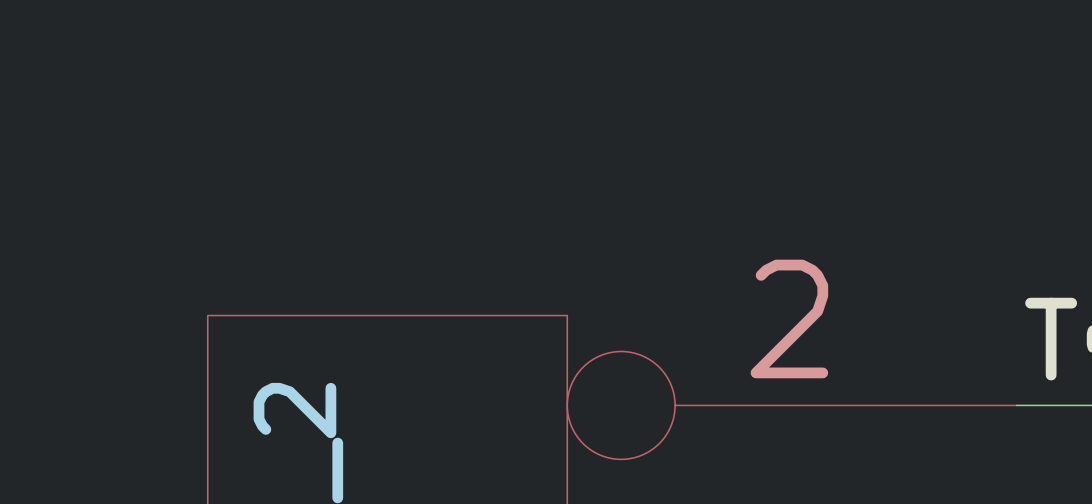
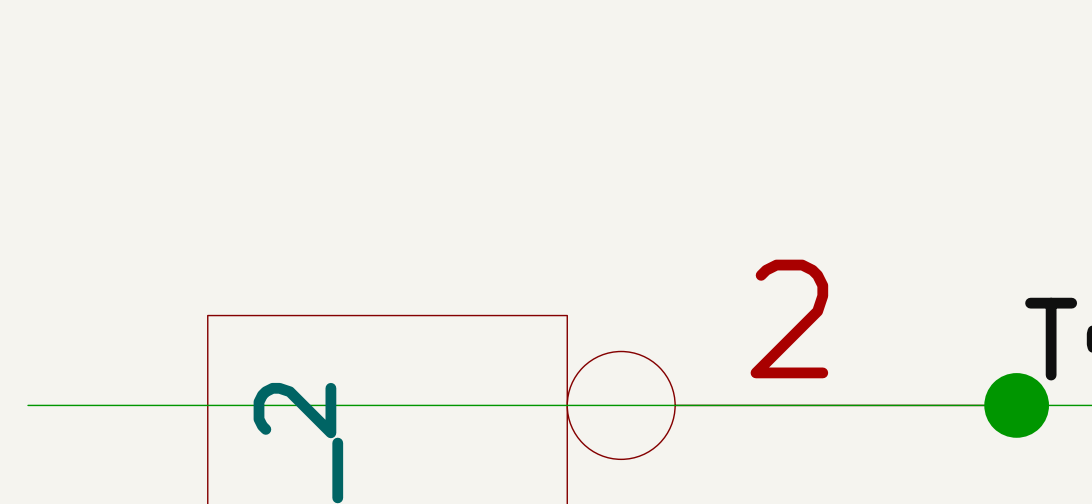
wire: none -> (28, 405) (1016, 405)
junction: none -> (1016, 405)

